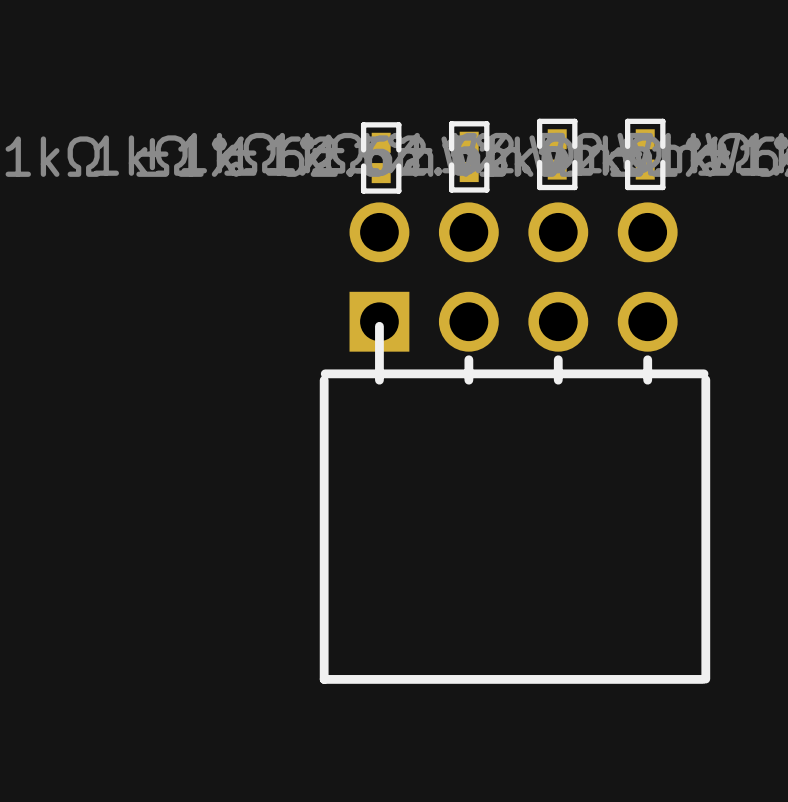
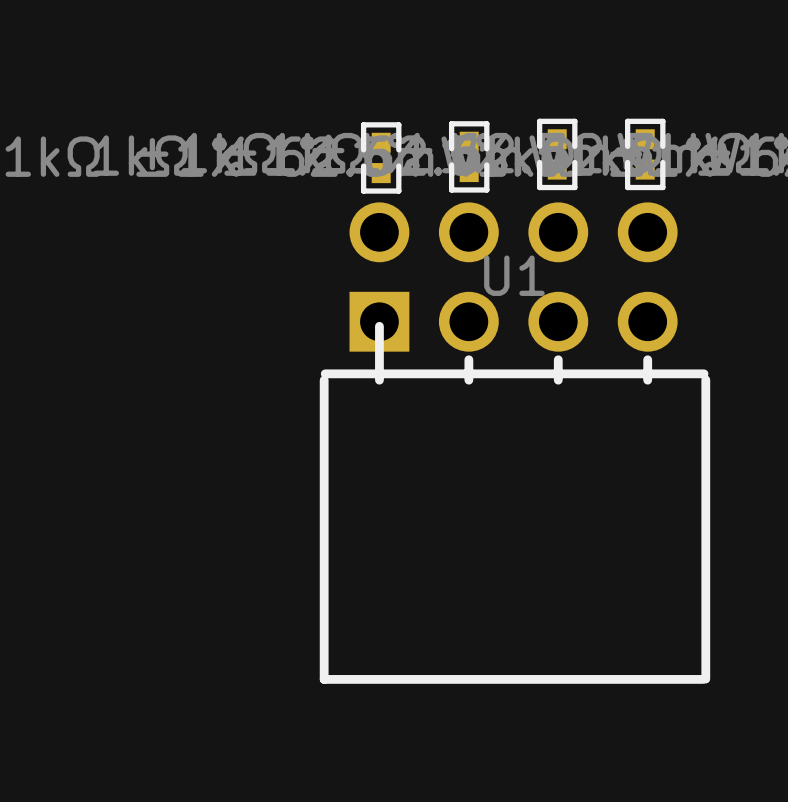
U1 name: none -> U1 (514, 275)

